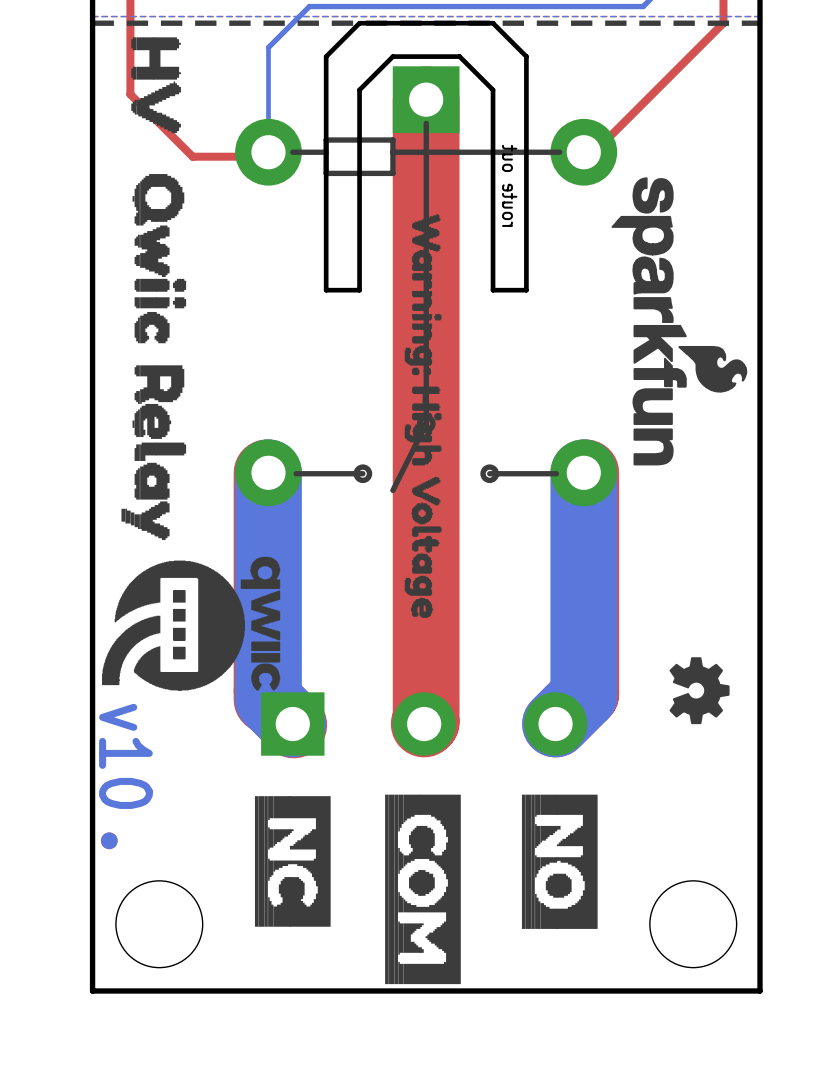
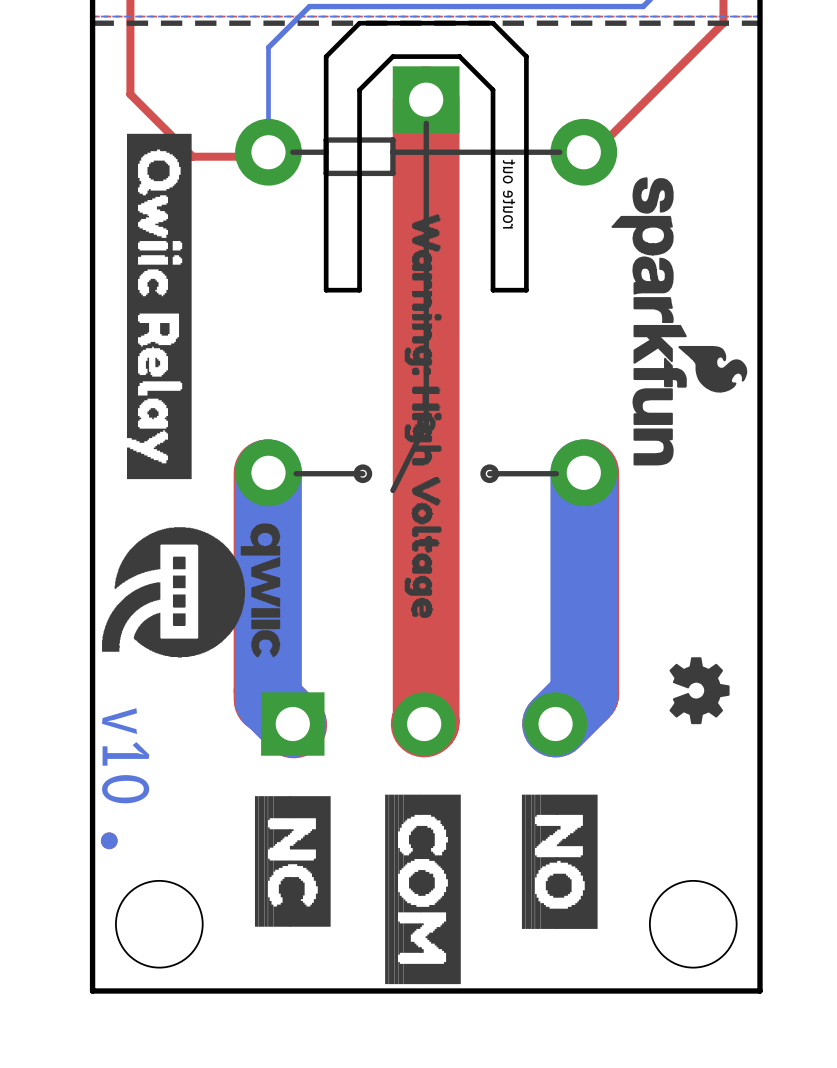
drawing: [131, 37, 181, 133] -> none
drawing: none -> [126, 133, 192, 480]
drawing: [121, 174, 187, 541] -> none
drawing position: (191, 623) -> (191, 590)

